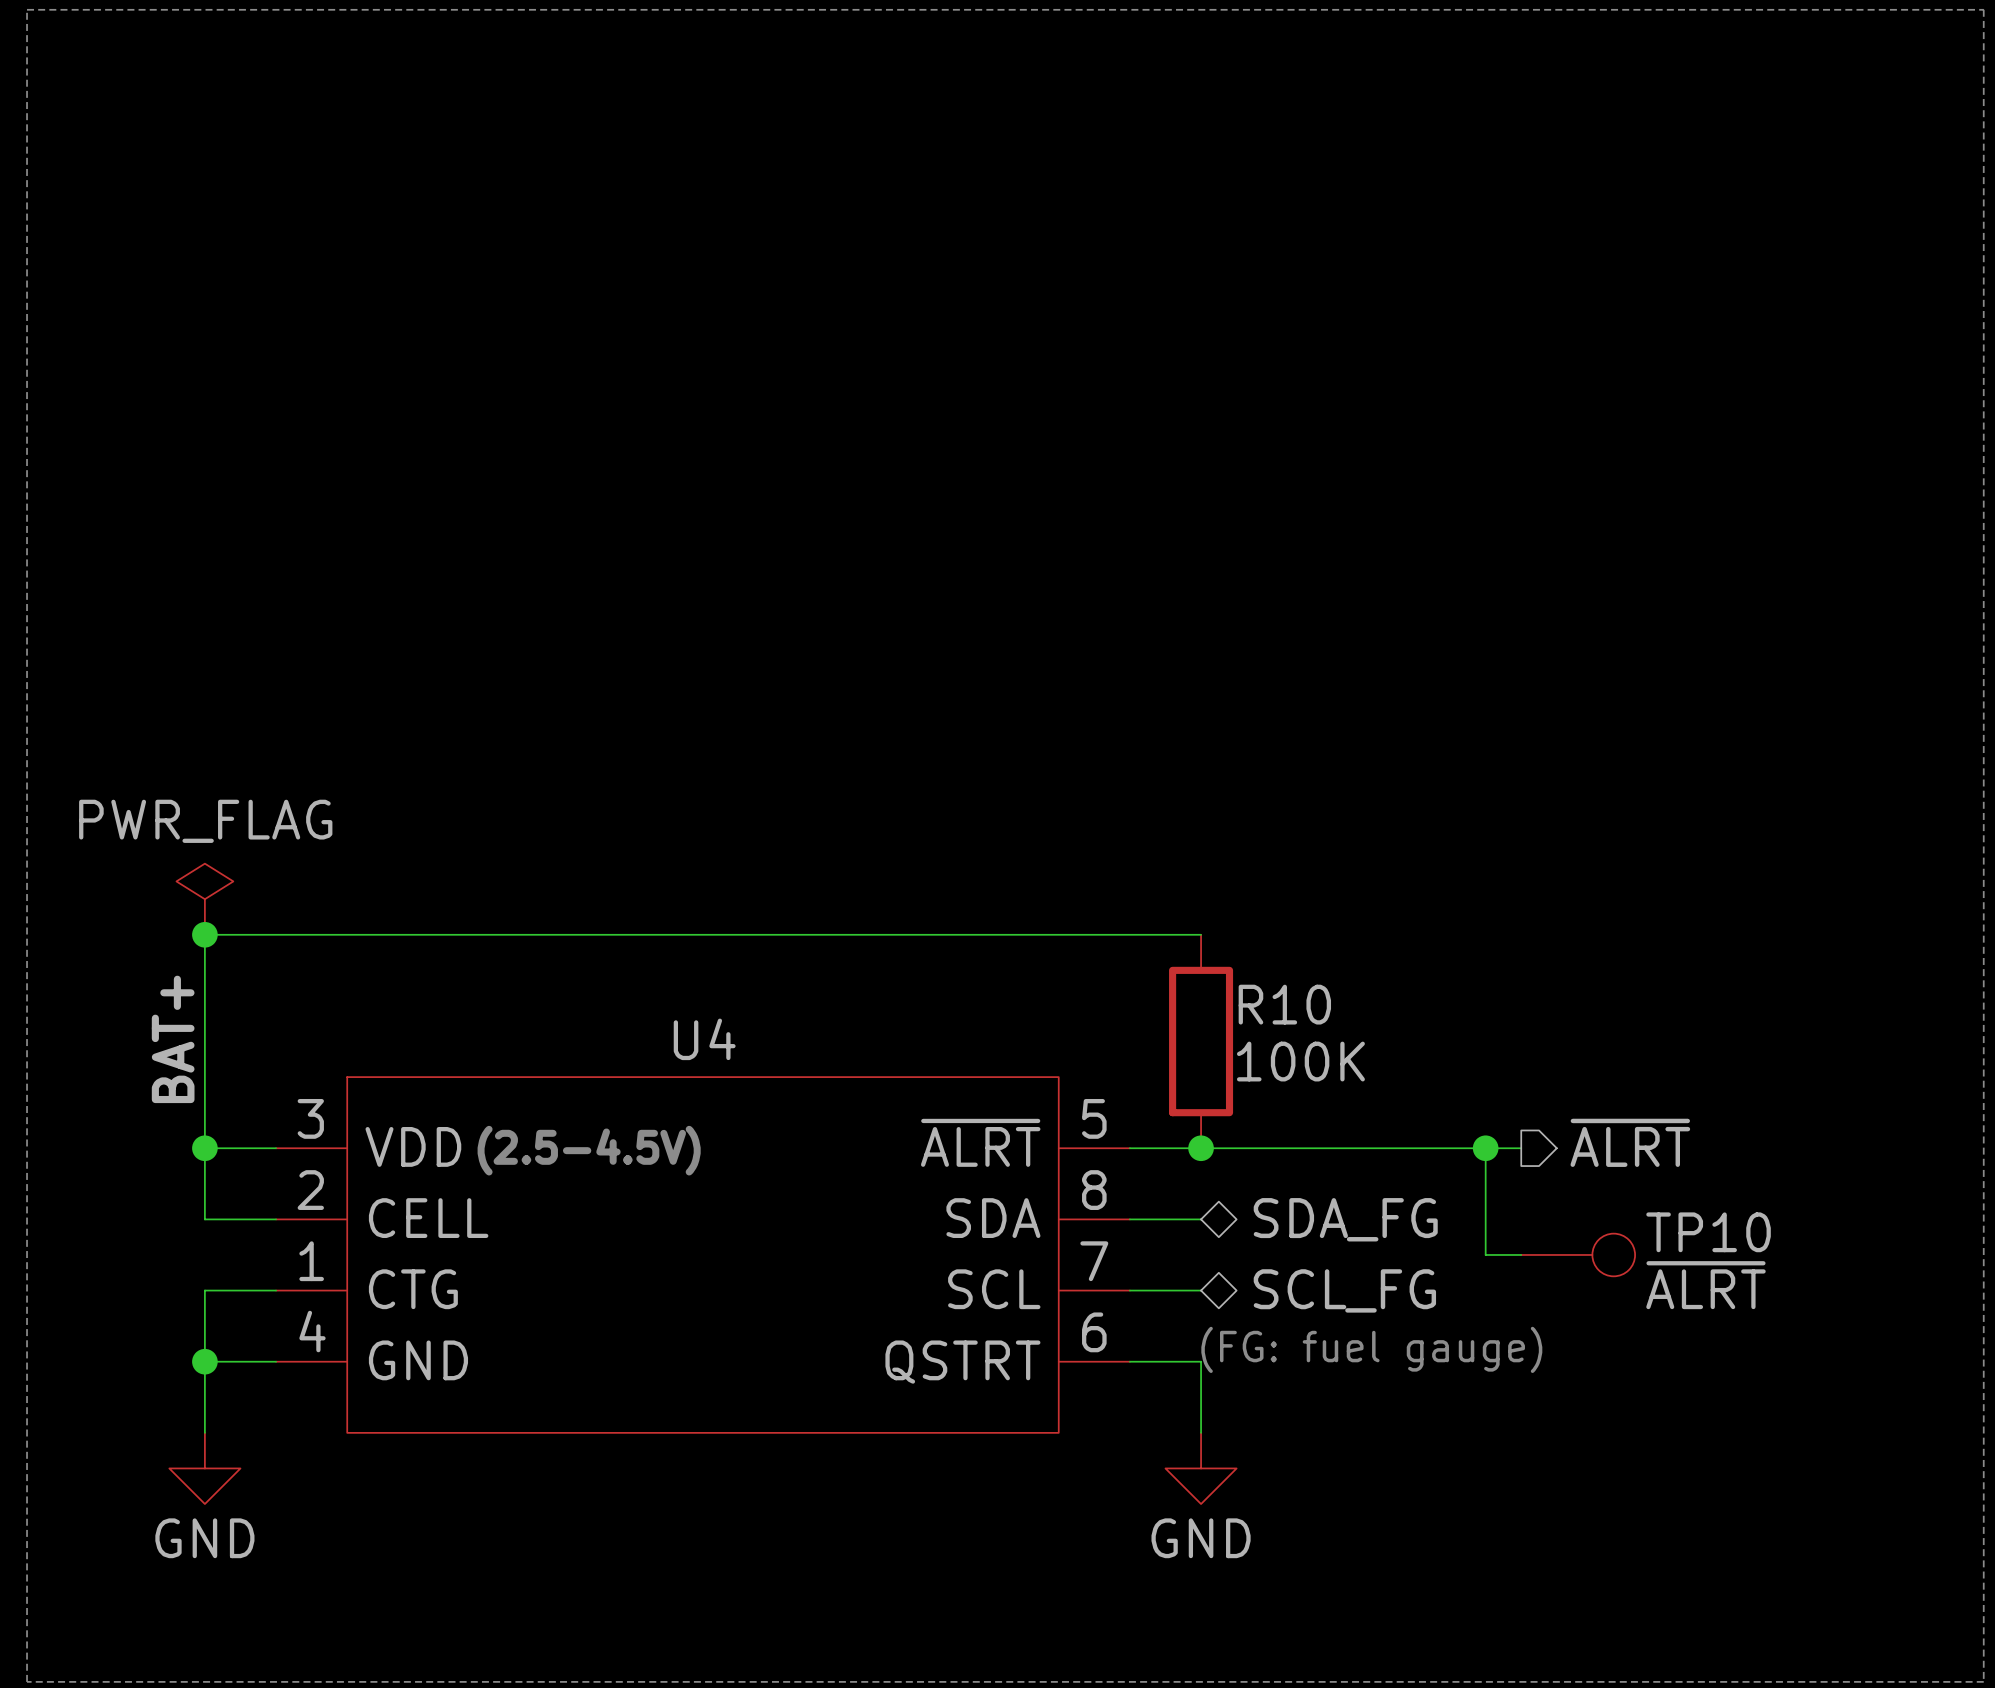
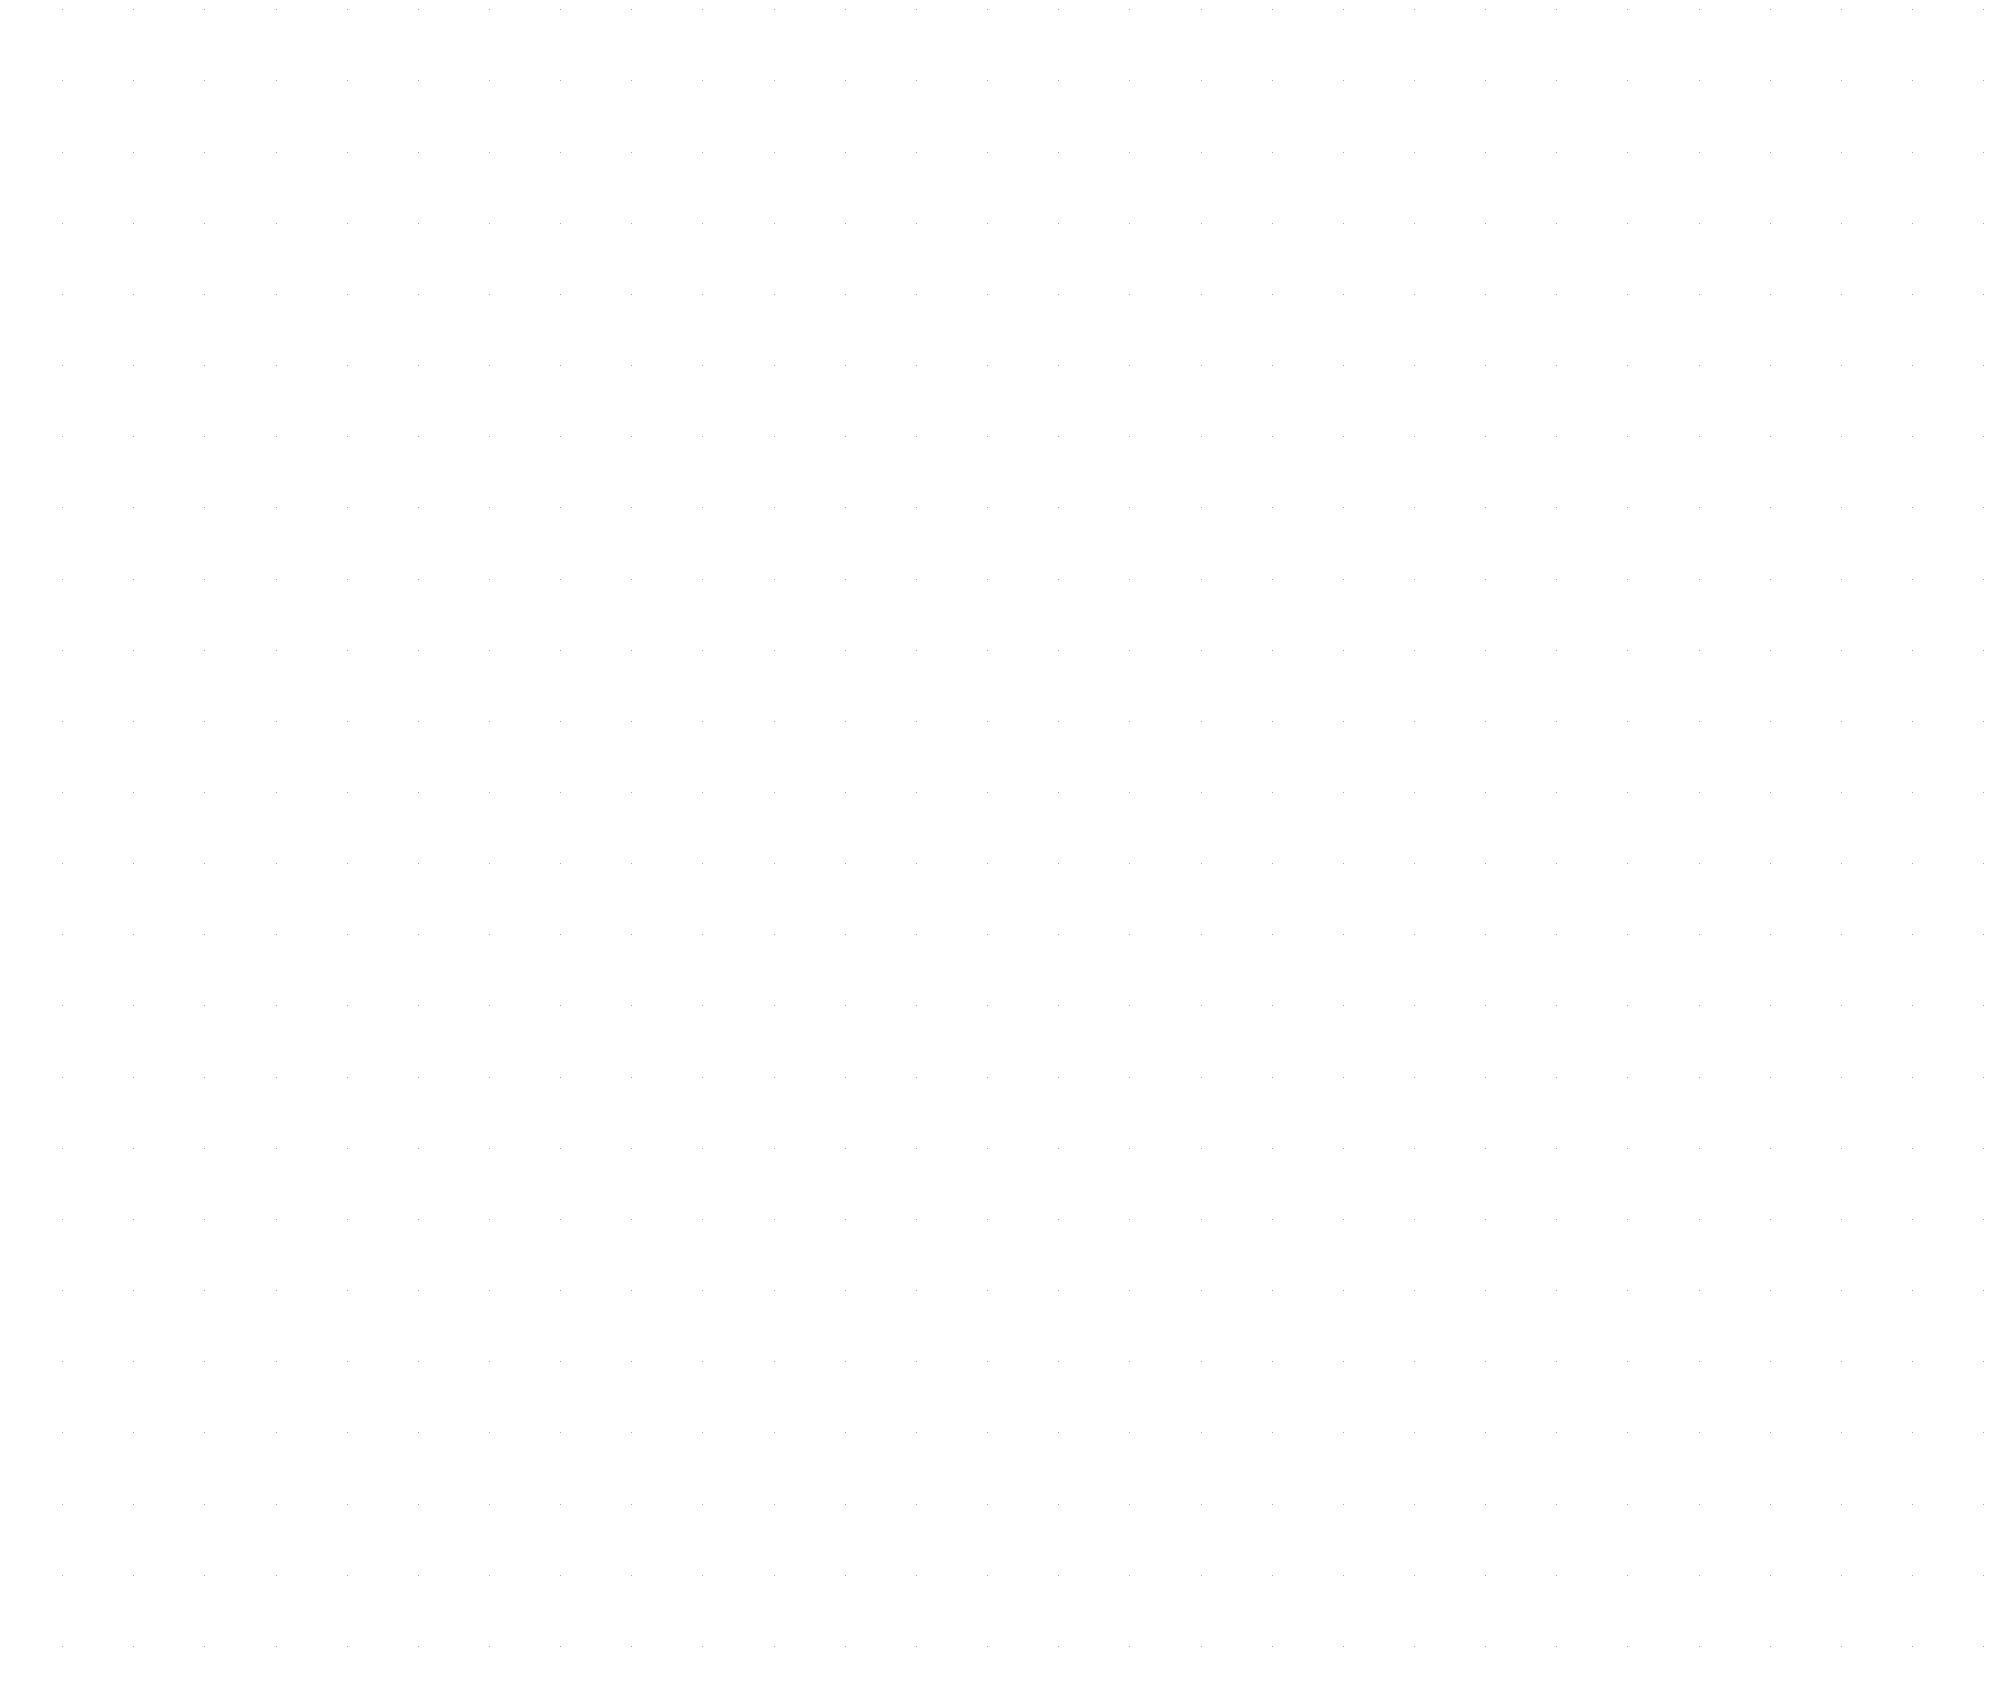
line: (27, 9) (1983, 9) (1983, 1681) (27, 1681) (27, 9) -> none
power symbol: PWR_FLAG (204, 899) -> none
junction: (204, 934) -> none
wire: (1201, 934) (204, 934) (204, 1219) (276, 1219) -> none
label: BAT+ (173, 1039) -> none
R10: 100K (1201, 1041) -> none
hierarchical label: ~{ALRT} (1630, 1142) -> none
wire: (204, 1148) (276, 1148) -> none
junction: (204, 1148) -> none
wire: (1129, 1148) (1521, 1148) -> none
junction: (1201, 1148) -> none
wire: (1485, 1148) (1485, 1254) (1521, 1254) -> none
junction: (1485, 1148) -> none
text: (2.5-4.5V) (589, 1150) -> none
wire: (1129, 1219) (1201, 1219) -> none
hierarchical label: SDA_FG (1345, 1219) -> none
U4: (702, 1254) -> none
TP10: ~{ALRT} (1578, 1254) -> none
wire: (276, 1290) (204, 1290) (204, 1432) -> none
wire: (1129, 1290) (1201, 1290) -> none
hierarchical label: SCL_FG (1344, 1290) -> none
text: (FG: fuel gauge) (1371, 1349) -> none
wire: (204, 1361) (276, 1361) -> none
junction: (204, 1361) -> none
wire: (1129, 1361) (1201, 1361) (1201, 1432) -> none
power symbol: GND (204, 1468) -> none
power symbol: GND (1201, 1468) -> none

